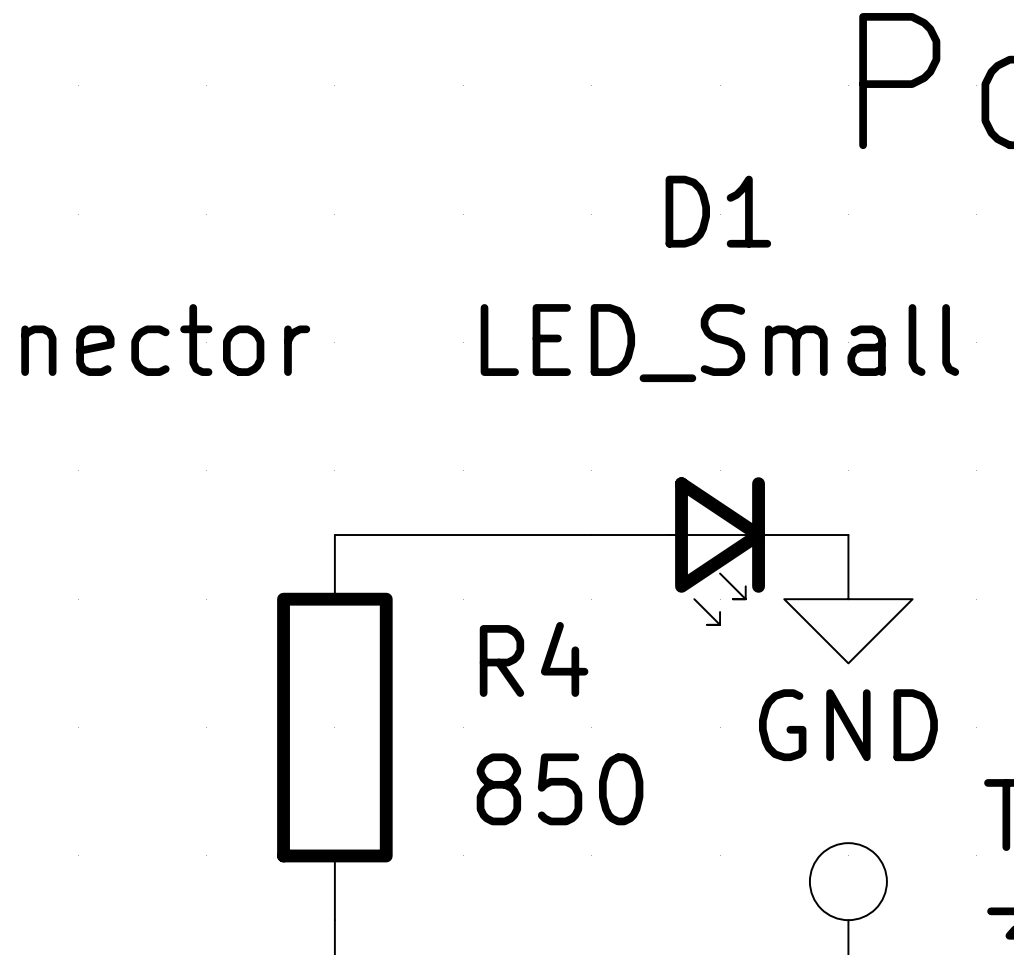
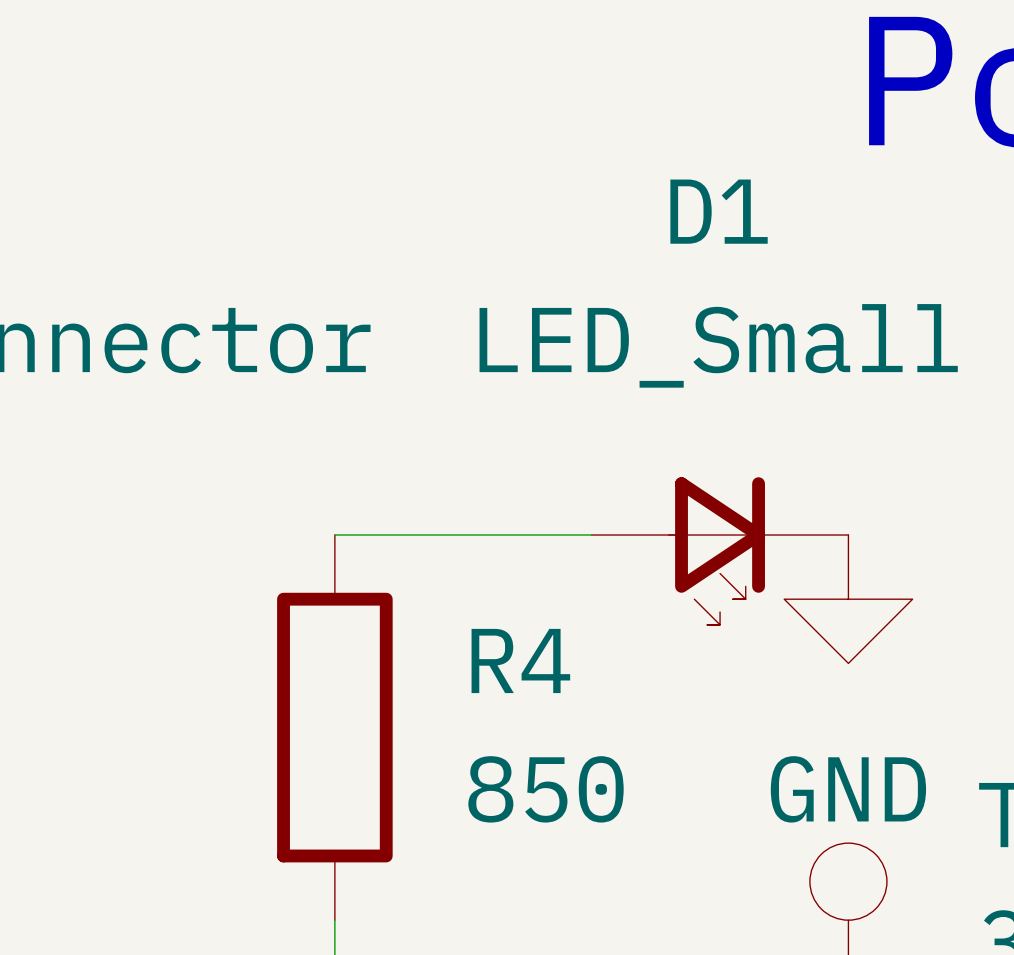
power symbol text position: GND (848, 725) -> GND (848, 789)

